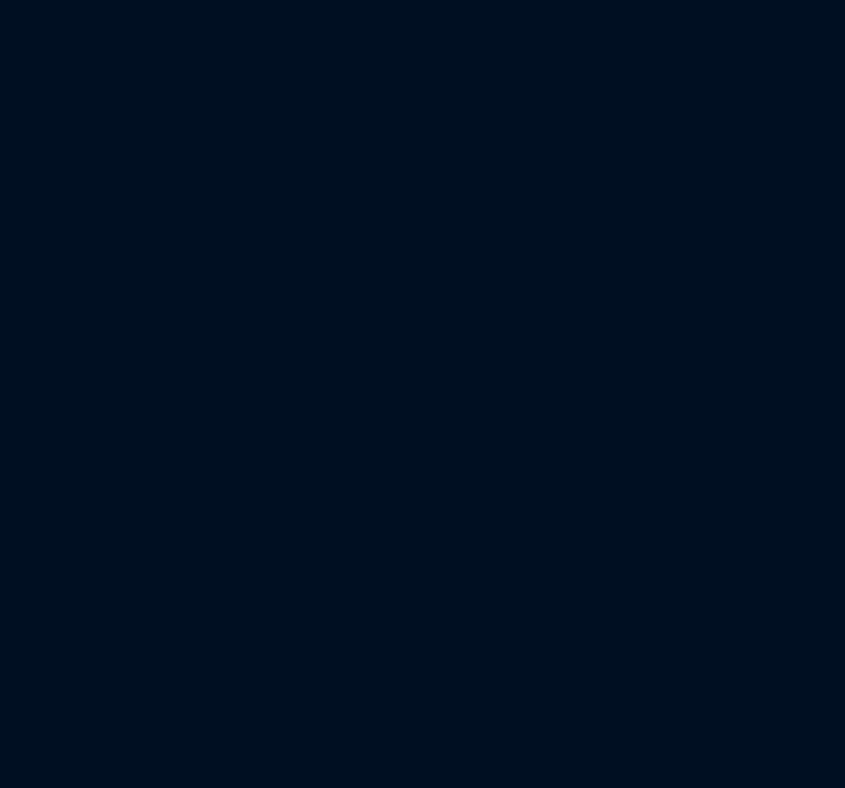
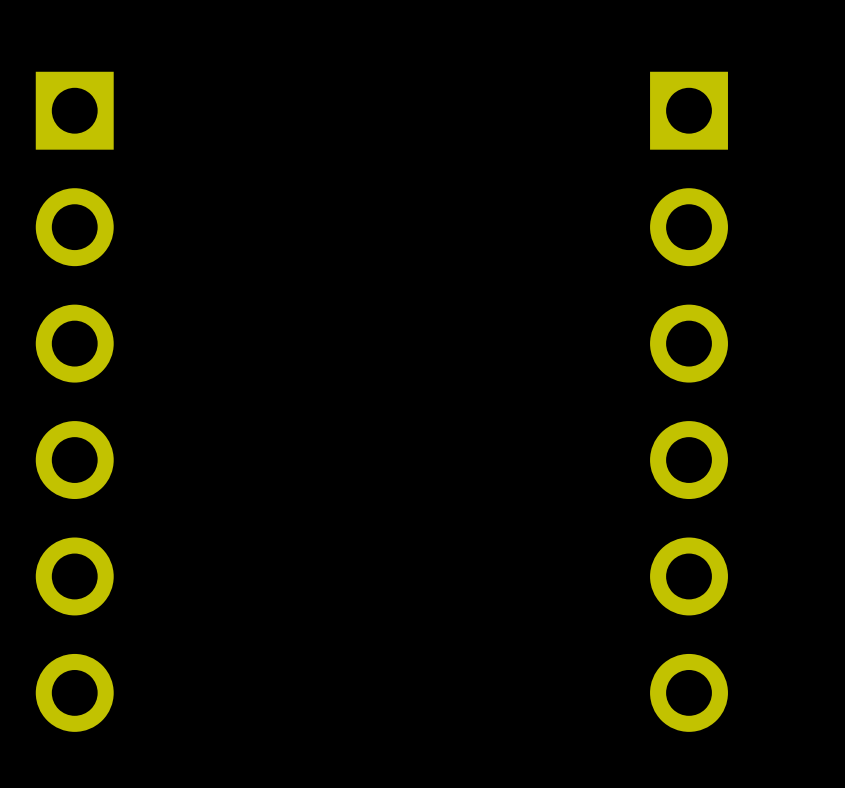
part: none -> (74, 401)
part: none -> (689, 401)

